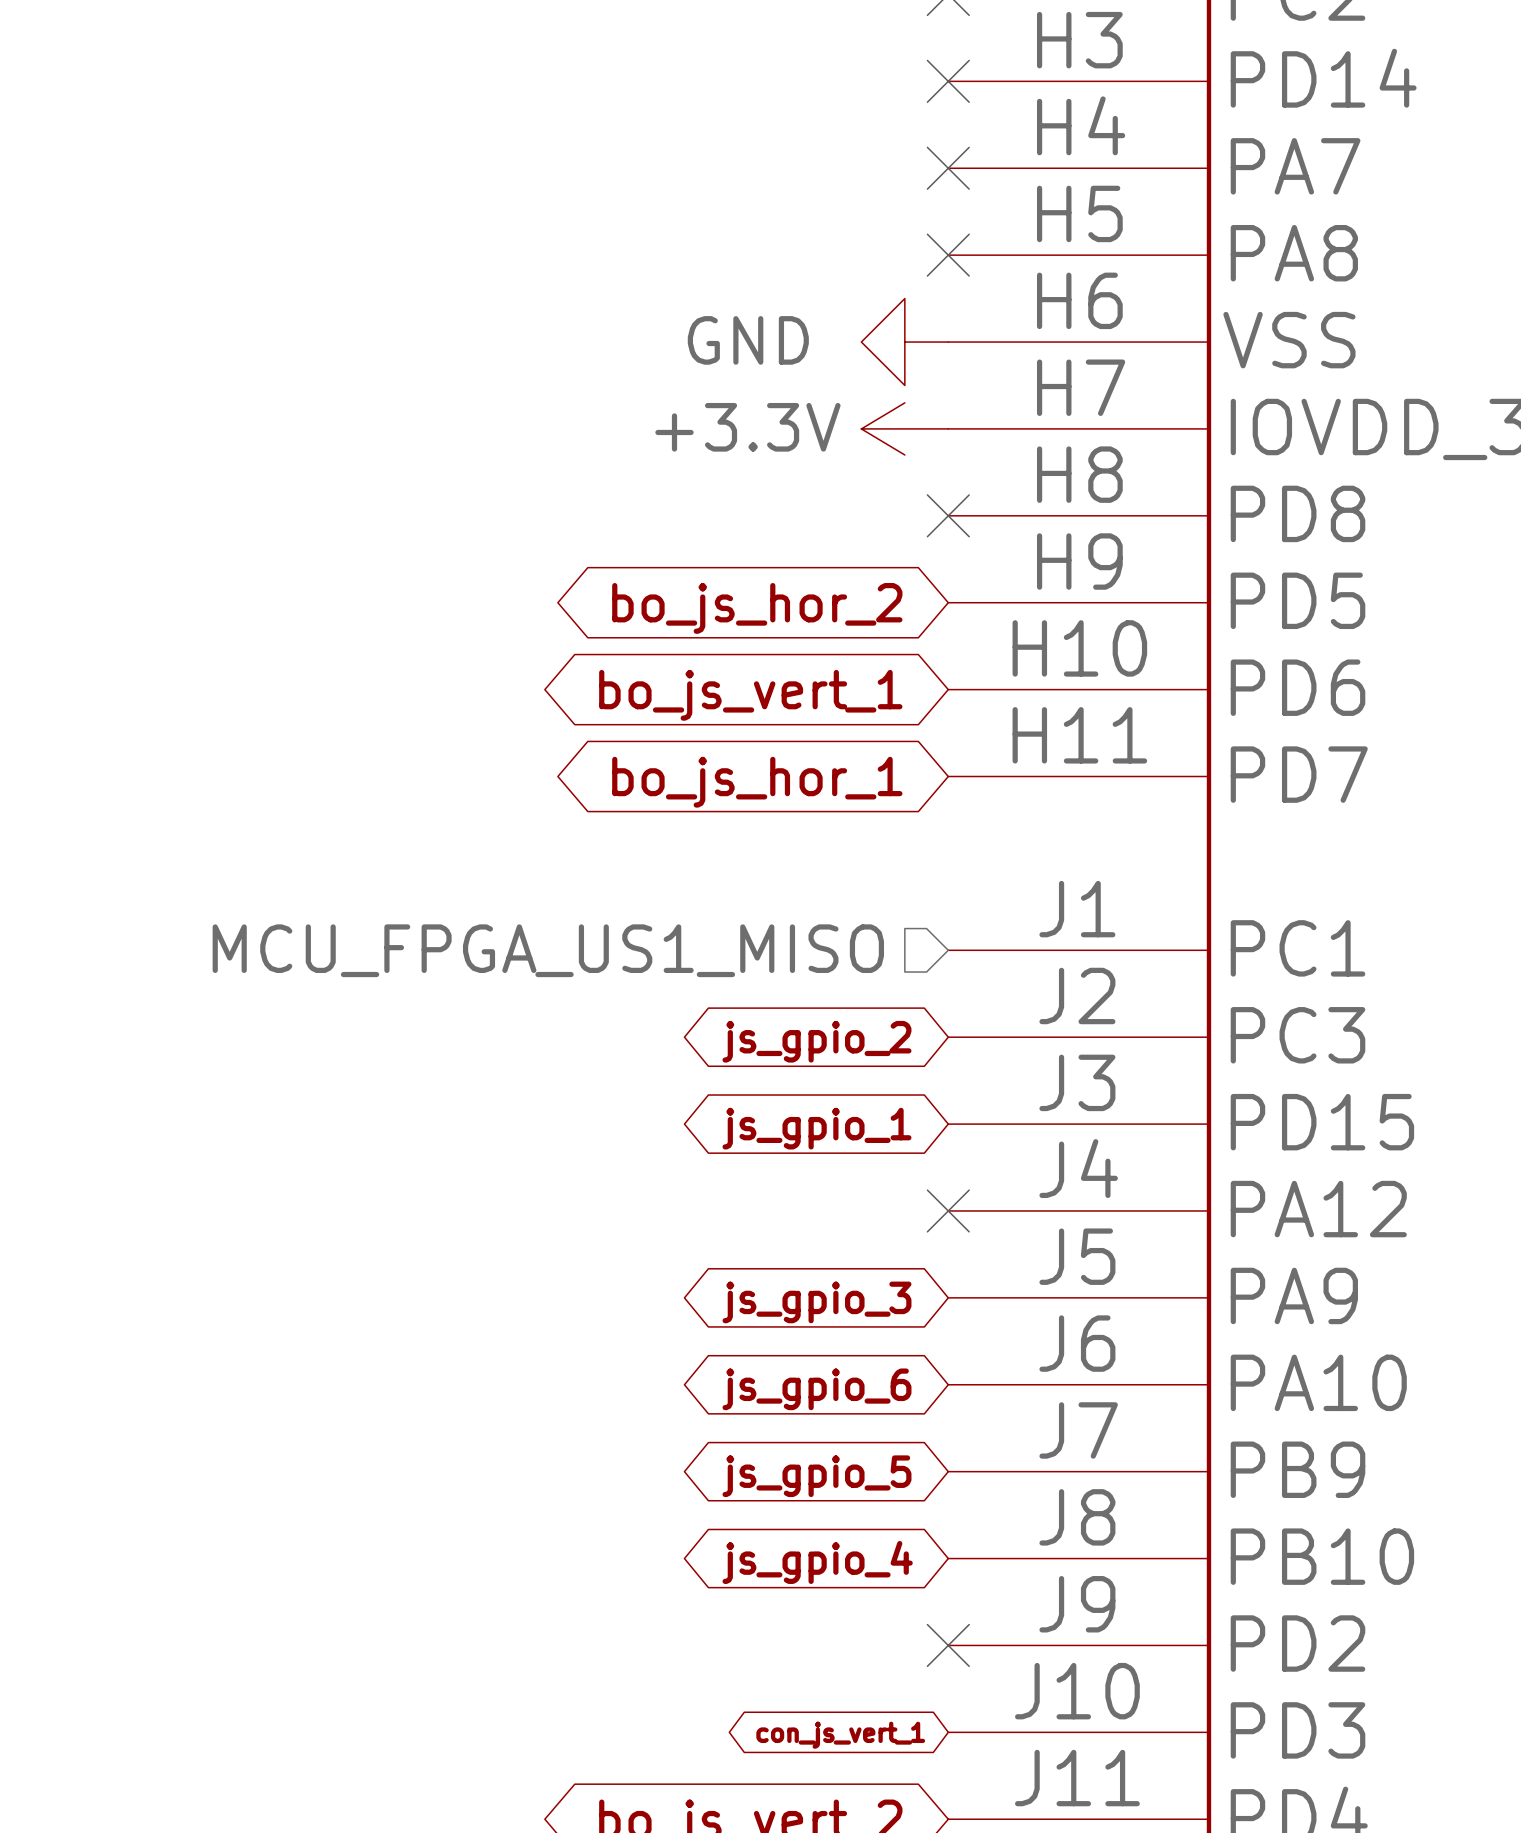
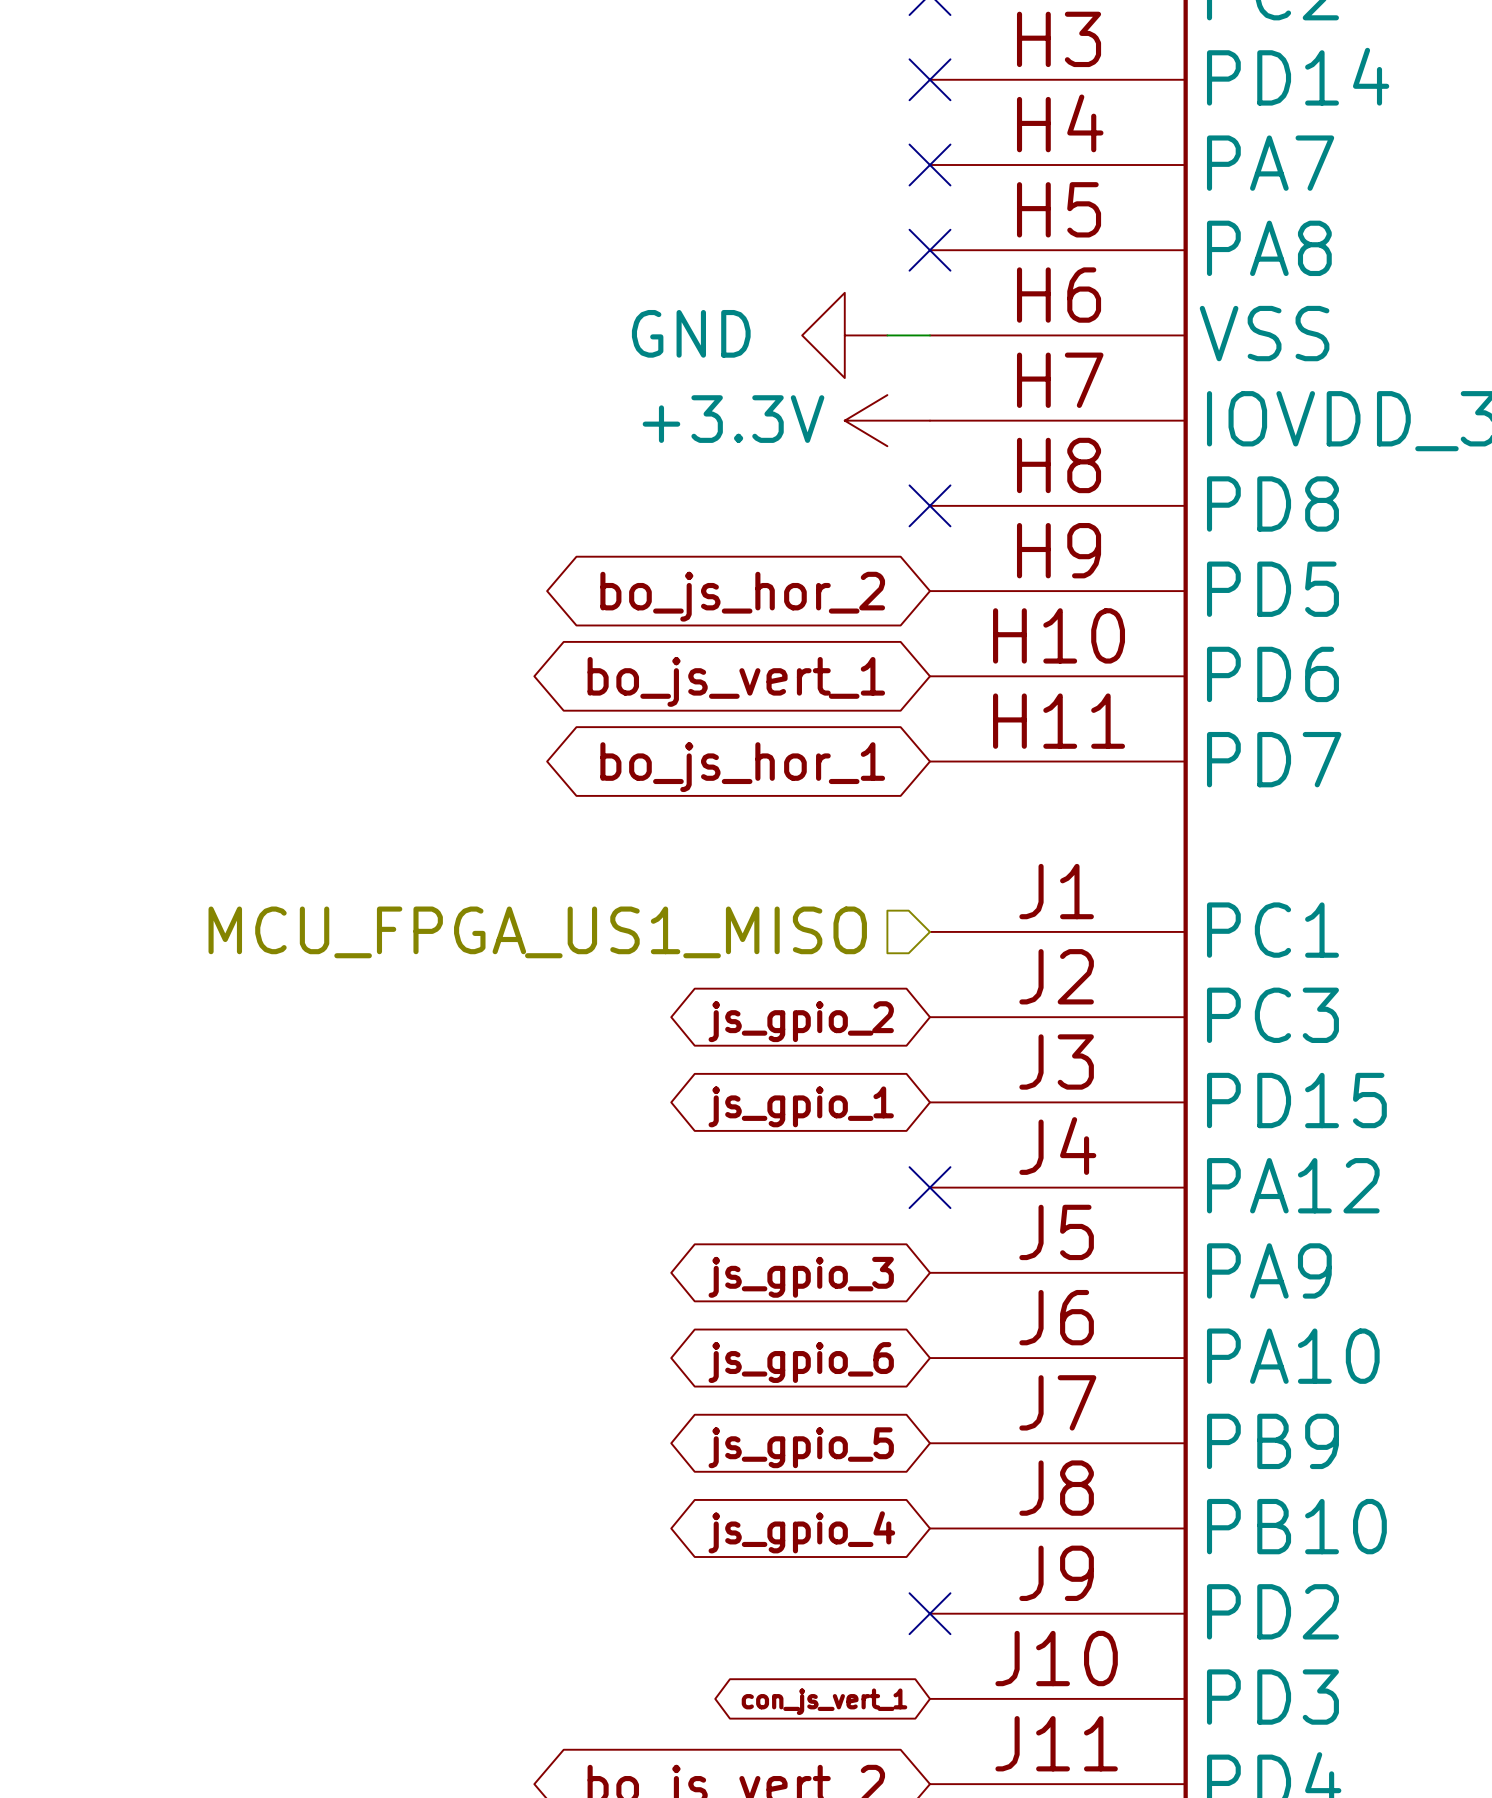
power symbol position: GND (904, 342) -> GND (844, 335)

